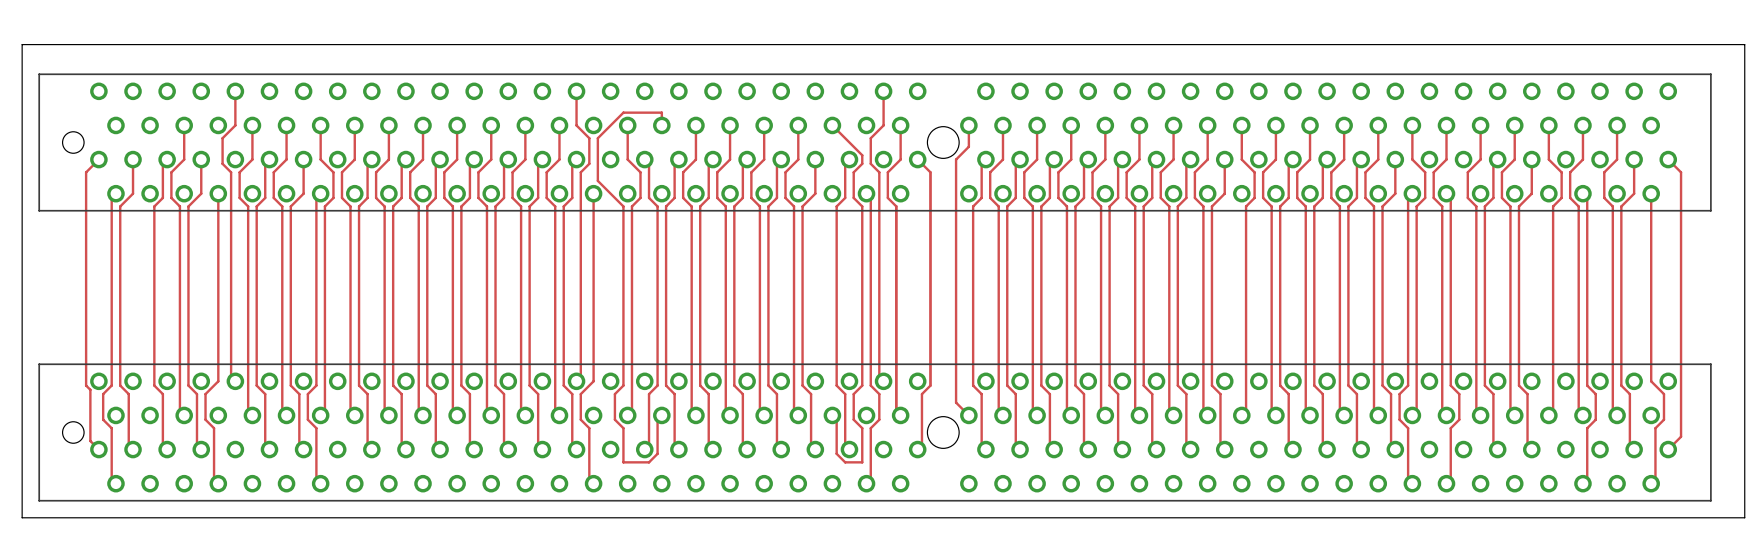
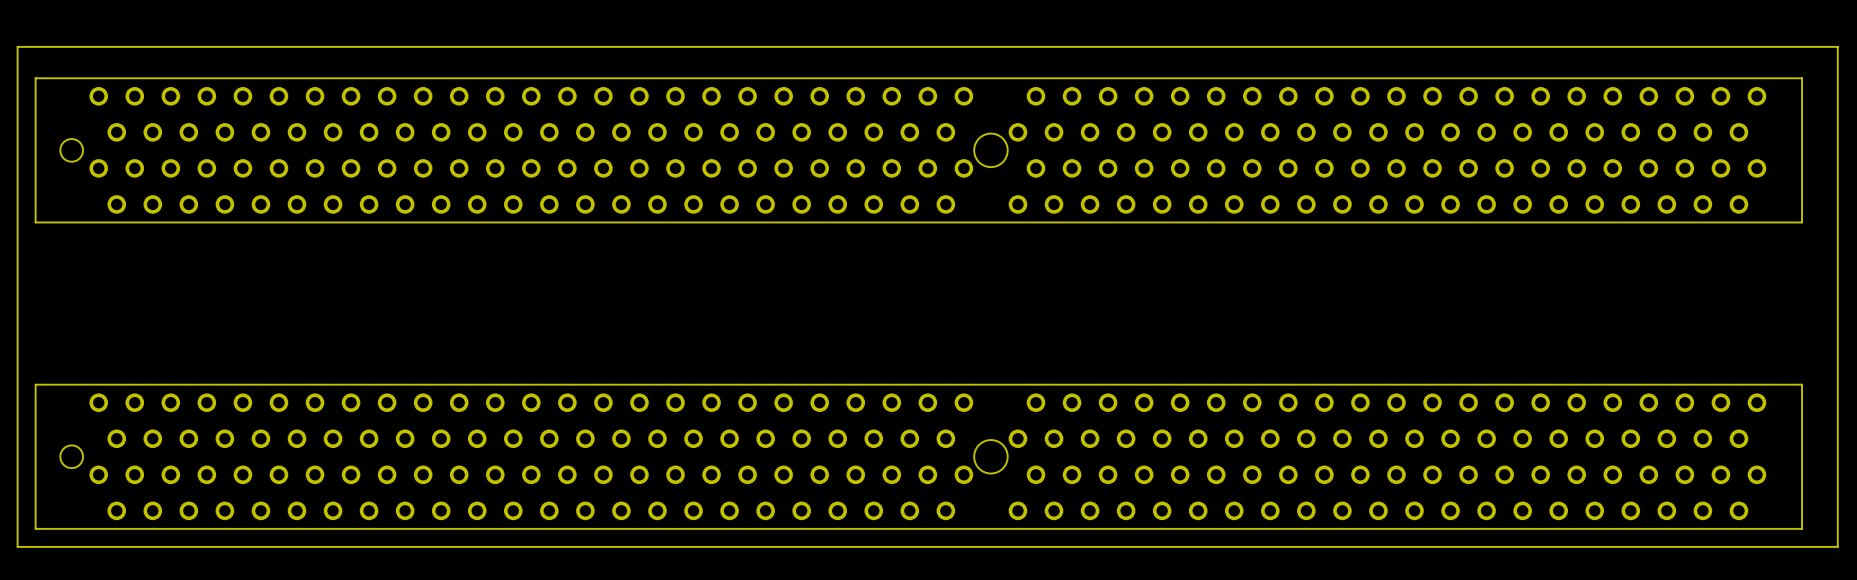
part footprint: [38, 73, 1712, 212] -> [34, 77, 1803, 224]
track: (235, 91) (235, 125) (222, 138) (222, 163) (231, 172) (231, 377) (235, 381) -> none
track: (576, 91) (576, 125) (589, 138) (589, 163) (580, 172) (580, 377) (576, 381) -> none
track: (883, 91) (883, 125) (870, 138) (870, 163) (879, 172) (879, 377) (883, 381) -> none
track: (184, 125) (184, 159) (171, 172) (171, 197) (179, 206) (179, 411) (184, 415) -> none
track: (252, 125) (252, 159) (239, 172) (239, 197) (248, 206) (248, 411) (252, 415) -> none
track: (286, 125) (286, 159) (273, 172) (273, 197) (282, 206) (282, 411) (286, 415) -> none
track: (320, 125) (320, 159) (333, 172) (333, 197) (324, 206) (324, 411) (320, 415) -> none
track: (354, 125) (354, 159) (341, 172) (341, 197) (350, 206) (350, 411) (354, 415) -> none
track: (388, 125) (388, 159) (376, 172) (376, 197) (384, 206) (384, 411) (388, 415) -> none
track: (423, 125) (423, 159) (410, 172) (410, 197) (418, 206) (418, 411) (423, 415) -> none
track: (457, 125) (457, 159) (444, 172) (444, 197) (452, 206) (452, 411) (457, 415) -> none
track: (491, 125) (491, 159) (478, 172) (478, 197) (486, 206) (486, 411) (491, 415) -> none
track: (525, 125) (525, 159) (512, 172) (512, 197) (521, 206) (521, 411) (525, 415) -> none
track: (559, 125) (559, 159) (546, 172) (546, 197) (555, 206) (555, 411) (559, 415) -> none
track: (627, 125) (627, 159) (640, 172) (640, 197) (631, 206) (631, 411) (627, 415) -> none
track: (661, 125) (661, 112) (623, 112) (597, 138) (597, 180) (623, 206) (623, 385) (614, 394) (614, 419) (623, 428) (623, 462) (649, 462) (657, 453) (657, 419) (661, 415) -> none
track: (695, 125) (695, 159) (683, 172) (683, 197) (691, 206) (691, 411) (695, 415) -> none
track: (730, 125) (730, 159) (717, 172) (717, 197) (725, 206) (725, 411) (730, 415) -> none
track: (764, 125) (764, 159) (751, 172) (751, 197) (759, 206) (759, 411) (764, 415) -> none
track: (798, 125) (798, 159) (785, 172) (785, 197) (794, 206) (794, 411) (798, 415) -> none
track: (832, 125) (862, 155) (862, 163) (853, 172) (853, 197) (862, 206) (862, 385) (853, 394) (853, 419) (862, 428) (862, 462) (845, 462) (836, 453) (836, 419) (832, 415) -> none
track: (900, 125) (900, 159) (887, 172) (887, 197) (896, 206) (896, 411) (900, 415) -> none
track: (968, 125) (968, 146) (956, 159) (956, 402) (968, 415) -> none
track: (1002, 125) (1002, 159) (990, 172) (990, 197) (998, 206) (998, 411) (1002, 415) -> none
track: (1037, 125) (1037, 159) (1024, 172) (1024, 197) (1032, 206) (1032, 411) (1037, 415) -> none
track: (1071, 125) (1071, 159) (1058, 172) (1058, 197) (1066, 206) (1066, 411) (1071, 415) -> none
track: (1105, 125) (1105, 159) (1092, 172) (1092, 197) (1101, 206) (1101, 411) (1105, 415) -> none
track: (1139, 125) (1139, 159) (1126, 172) (1126, 197) (1135, 206) (1135, 411) (1139, 415) -> none
track: (1173, 125) (1173, 159) (1160, 172) (1160, 197) (1169, 206) (1169, 411) (1173, 415) -> none
track: (1207, 125) (1207, 159) (1194, 172) (1194, 197) (1203, 206) (1203, 411) (1207, 415) -> none
track: (1241, 125) (1241, 159) (1254, 172) (1254, 197) (1246, 206) (1246, 411) (1241, 415) -> none
track: (1275, 125) (1275, 159) (1263, 172) (1263, 197) (1271, 206) (1271, 411) (1275, 415) -> none
track: (1310, 125) (1310, 159) (1297, 172) (1297, 197) (1305, 206) (1305, 411) (1310, 415) -> none
track: (1344, 125) (1344, 159) (1331, 172) (1331, 197) (1339, 206) (1339, 411) (1344, 415) -> none
track: (1378, 125) (1378, 159) (1365, 172) (1365, 197) (1374, 206) (1374, 411) (1378, 415) -> none
track: (1412, 125) (1412, 159) (1425, 172) (1425, 197) (1416, 206) (1416, 411) (1412, 415) -> none
track: (1446, 125) (1446, 159) (1433, 172) (1433, 197) (1442, 206) (1442, 411) (1446, 415) -> none
track: (1480, 125) (1480, 159) (1467, 172) (1467, 197) (1476, 206) (1476, 411) (1480, 415) -> none
track: (1514, 125) (1514, 159) (1501, 172) (1501, 197) (1510, 206) (1510, 411) (1514, 415) -> none
track: (1548, 125) (1548, 159) (1561, 172) (1561, 197) (1553, 206) (1553, 411) (1548, 415) -> none
track: (1582, 125) (1582, 159) (1570, 172) (1570, 197) (1578, 206) (1578, 411) (1582, 415) -> none
track: (1617, 125) (1617, 159) (1604, 172) (1604, 197) (1612, 206) (1612, 411) (1617, 415) -> none
track: (98, 159) (86, 172) (86, 385) (90, 389) (90, 441) (98, 449) -> none
track: (133, 159) (133, 193) (120, 206) (120, 385) (128, 394) (128, 445) (133, 449) -> none
track: (167, 159) (162, 163) (162, 197) (154, 206) (154, 385) (162, 394) (162, 445) (167, 449) -> none
track: (201, 159) (201, 193) (188, 206) (188, 385) (196, 394) (196, 445) (201, 449) -> none
track: (269, 159) (265, 163) (265, 197) (256, 206) (256, 385) (265, 394) (265, 445) (269, 449) -> none
track: (303, 159) (303, 193) (290, 206) (290, 385) (299, 394) (299, 445) (303, 449) -> none
track: (371, 159) (367, 163) (367, 197) (359, 206) (359, 385) (367, 394) (367, 445) (371, 449) -> none
track: (405, 159) (401, 163) (401, 197) (393, 206) (393, 385) (401, 394) (401, 445) (405, 449) -> none
track: (440, 159) (435, 163) (435, 197) (427, 206) (427, 385) (435, 394) (435, 445) (440, 449) -> none
track: (474, 159) (469, 163) (469, 197) (461, 206) (461, 385) (469, 394) (469, 445) (474, 449) -> none
track: (508, 159) (504, 163) (504, 197) (495, 206) (495, 385) (504, 394) (504, 445) (508, 449) -> none
track: (542, 159) (538, 163) (538, 197) (529, 206) (529, 385) (538, 394) (538, 445) (542, 449) -> none
track: (576, 159) (572, 163) (572, 197) (563, 206) (563, 385) (572, 394) (572, 445) (576, 449) -> none
track: (644, 159) (649, 163) (649, 197) (657, 206) (657, 385) (649, 394) (649, 445) (644, 449) -> none
track: (678, 159) (674, 163) (674, 197) (666, 206) (666, 385) (674, 394) (674, 445) (678, 449) -> none
track: (713, 159) (708, 163) (708, 197) (700, 206) (700, 385) (708, 394) (708, 445) (713, 449) -> none
track: (747, 159) (742, 163) (742, 197) (734, 206) (734, 385) (742, 394) (742, 445) (747, 449) -> none
track: (781, 159) (776, 163) (776, 197) (768, 206) (768, 385) (776, 394) (776, 445) (781, 449) -> none
track: (815, 159) (815, 193) (802, 206) (802, 385) (811, 394) (811, 445) (815, 449) -> none
track: (849, 159) (845, 163) (845, 197) (836, 206) (836, 385) (845, 394) (845, 445) (849, 449) -> none
track: (917, 159) (930, 172) (930, 385) (921, 394) (921, 445) (917, 449) -> none
track: (985, 159) (981, 163) (981, 197) (973, 206) (973, 385) (981, 394) (981, 445) (985, 449) -> none
track: (1020, 159) (1015, 163) (1015, 197) (1007, 206) (1007, 385) (1015, 394) (1015, 445) (1020, 449) -> none
track: (1054, 159) (1049, 163) (1049, 197) (1041, 206) (1041, 385) (1049, 394) (1049, 445) (1054, 449) -> none
track: (1088, 159) (1084, 163) (1084, 197) (1075, 206) (1075, 385) (1084, 394) (1084, 445) (1088, 449) -> none
track: (1122, 159) (1118, 163) (1118, 197) (1109, 206) (1109, 385) (1118, 394) (1118, 445) (1122, 449) -> none
track: (1156, 159) (1152, 163) (1152, 197) (1143, 206) (1143, 385) (1152, 394) (1152, 445) (1156, 449) -> none
track: (1190, 159) (1186, 163) (1186, 197) (1177, 206) (1177, 385) (1186, 394) (1186, 445) (1190, 449) -> none
track: (1224, 159) (1224, 193) (1211, 206) (1211, 385) (1220, 394) (1220, 445) (1224, 449) -> none
track: (1292, 159) (1288, 163) (1288, 197) (1280, 206) (1280, 385) (1288, 394) (1288, 445) (1292, 449) -> none
track: (1327, 159) (1322, 163) (1322, 197) (1314, 206) (1314, 385) (1322, 394) (1322, 445) (1327, 449) -> none
track: (1361, 159) (1356, 163) (1356, 197) (1348, 206) (1348, 385) (1356, 394) (1356, 445) (1361, 449) -> none
track: (1395, 159) (1395, 193) (1382, 206) (1382, 385) (1391, 394) (1391, 445) (1395, 449) -> none
track: (1497, 159) (1493, 163) (1493, 197) (1484, 206) (1484, 385) (1493, 394) (1493, 445) (1497, 449) -> none
track: (1531, 159) (1531, 193) (1518, 206) (1518, 385) (1527, 394) (1527, 445) (1531, 449) -> none
track: (1634, 159) (1634, 193) (1621, 206) (1621, 385) (1629, 394) (1629, 445) (1634, 449) -> none
track: (1668, 159) (1681, 172) (1681, 436) (1668, 449) -> none
track: (115, 193) (111, 197) (111, 385) (103, 394) (103, 419) (111, 428) (111, 479) (115, 483) -> none
track: (218, 193) (218, 381) (205, 394) (205, 419) (214, 428) (214, 479) (218, 483) -> none
track: (320, 193) (316, 197) (316, 385) (307, 394) (307, 419) (316, 428) (316, 479) (320, 483) -> none
track: (593, 193) (593, 381) (580, 394) (580, 419) (589, 428) (589, 479) (593, 483) -> none
track: (866, 193) (870, 197) (870, 385) (879, 394) (879, 419) (870, 428) (870, 479) (866, 483) -> none
track: (1412, 193) (1408, 197) (1408, 385) (1399, 394) (1399, 419) (1408, 428) (1408, 479) (1412, 483) -> none
track: (1446, 193) (1450, 197) (1450, 385) (1459, 394) (1459, 419) (1450, 428) (1450, 479) (1446, 483) -> none
track: (1582, 193) (1587, 197) (1587, 385) (1595, 394) (1595, 419) (1587, 428) (1587, 479) (1582, 483) -> none
track: (1651, 193) (1651, 381) (1663, 394) (1663, 419) (1655, 428) (1655, 479) (1651, 483) -> none
part footprint: [38, 363, 1712, 502] -> [34, 383, 1803, 530]

